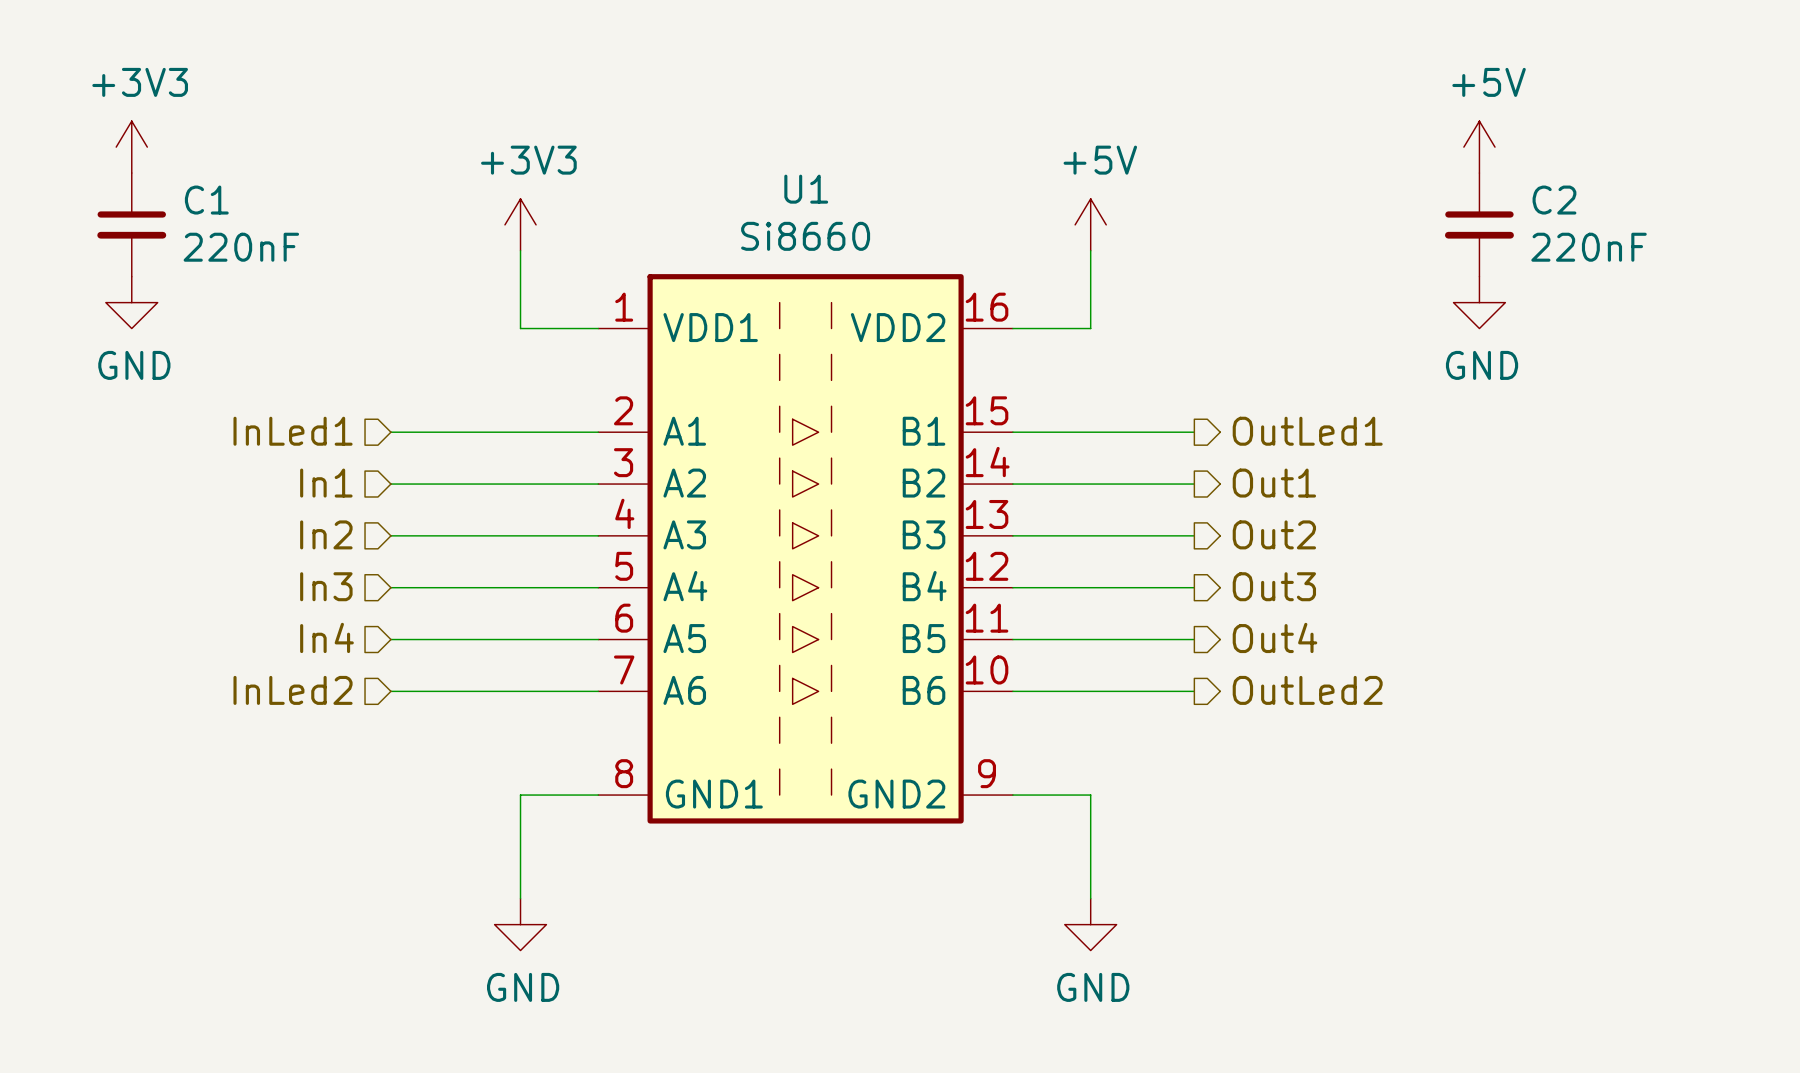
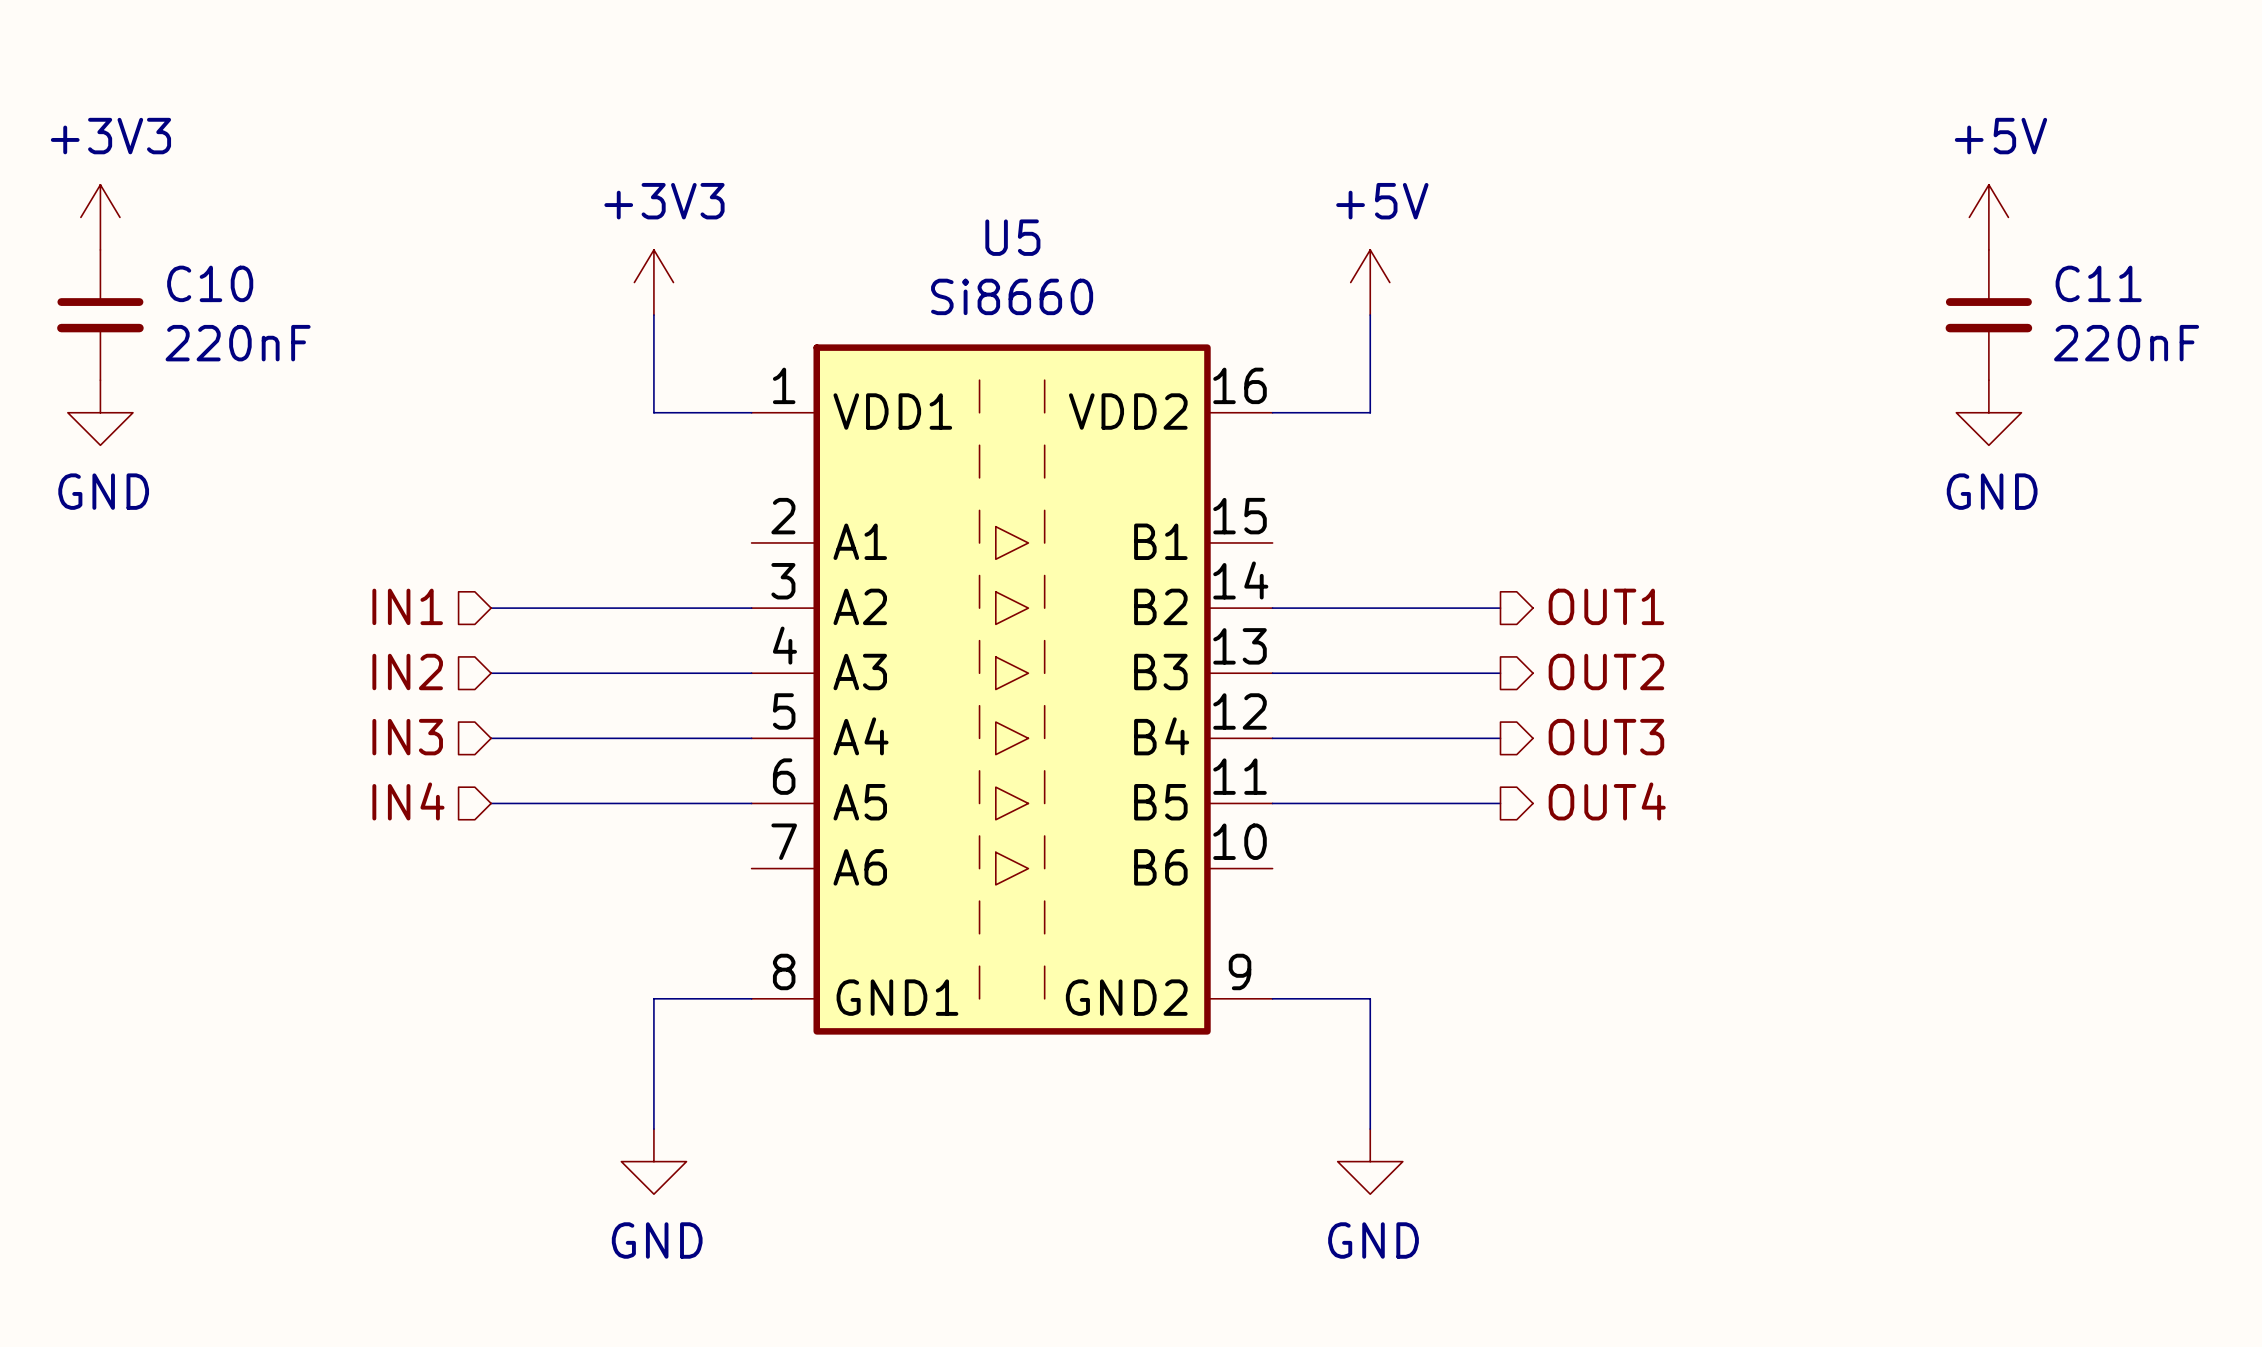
power symbol position: +3V3 (131, 147) -> +3V3 (100, 217)
power symbol position: +5V (1479, 147) -> +5V (1988, 217)
U1 name: U1 (806, 189) -> U5 (1012, 237)
C1: 220nF (131, 224) -> none
C2: 220nF (1479, 224) -> none
C10: none -> 220nF (100, 315)
C11: none -> 220nF (1988, 315)
power symbol position: GND (131, 302) -> GND (100, 412)
power symbol position: GND (1479, 302) -> GND (1988, 412)
hierarchical label: InLed1 (293, 431) -> none
hierarchical label: OutLed1 (1307, 431) -> none
wire: (390, 432) (598, 432) -> none
wire: (1012, 432) (1194, 432) -> none
hierarchical label: In1 (326, 483) -> IN1 (407, 606)
hierarchical label: Out1 (1274, 483) -> OUT1 (1606, 606)
hierarchical label: In2 (326, 534) -> IN2 (407, 672)
hierarchical label: Out2 (1274, 534) -> OUT2 (1606, 672)
hierarchical label: In3 (326, 586) -> IN3 (407, 737)
hierarchical label: Out3 (1274, 586) -> OUT3 (1606, 737)
hierarchical label: In4 (326, 637) -> IN4 (408, 801)
hierarchical label: Out4 (1274, 637) -> OUT4 (1607, 801)
hierarchical label: InLed2 (293, 690) -> none
hierarchical label: OutLed2 (1307, 690) -> none
wire: (390, 691) (598, 691) -> none
wire: (1012, 691) (1194, 691) -> none

